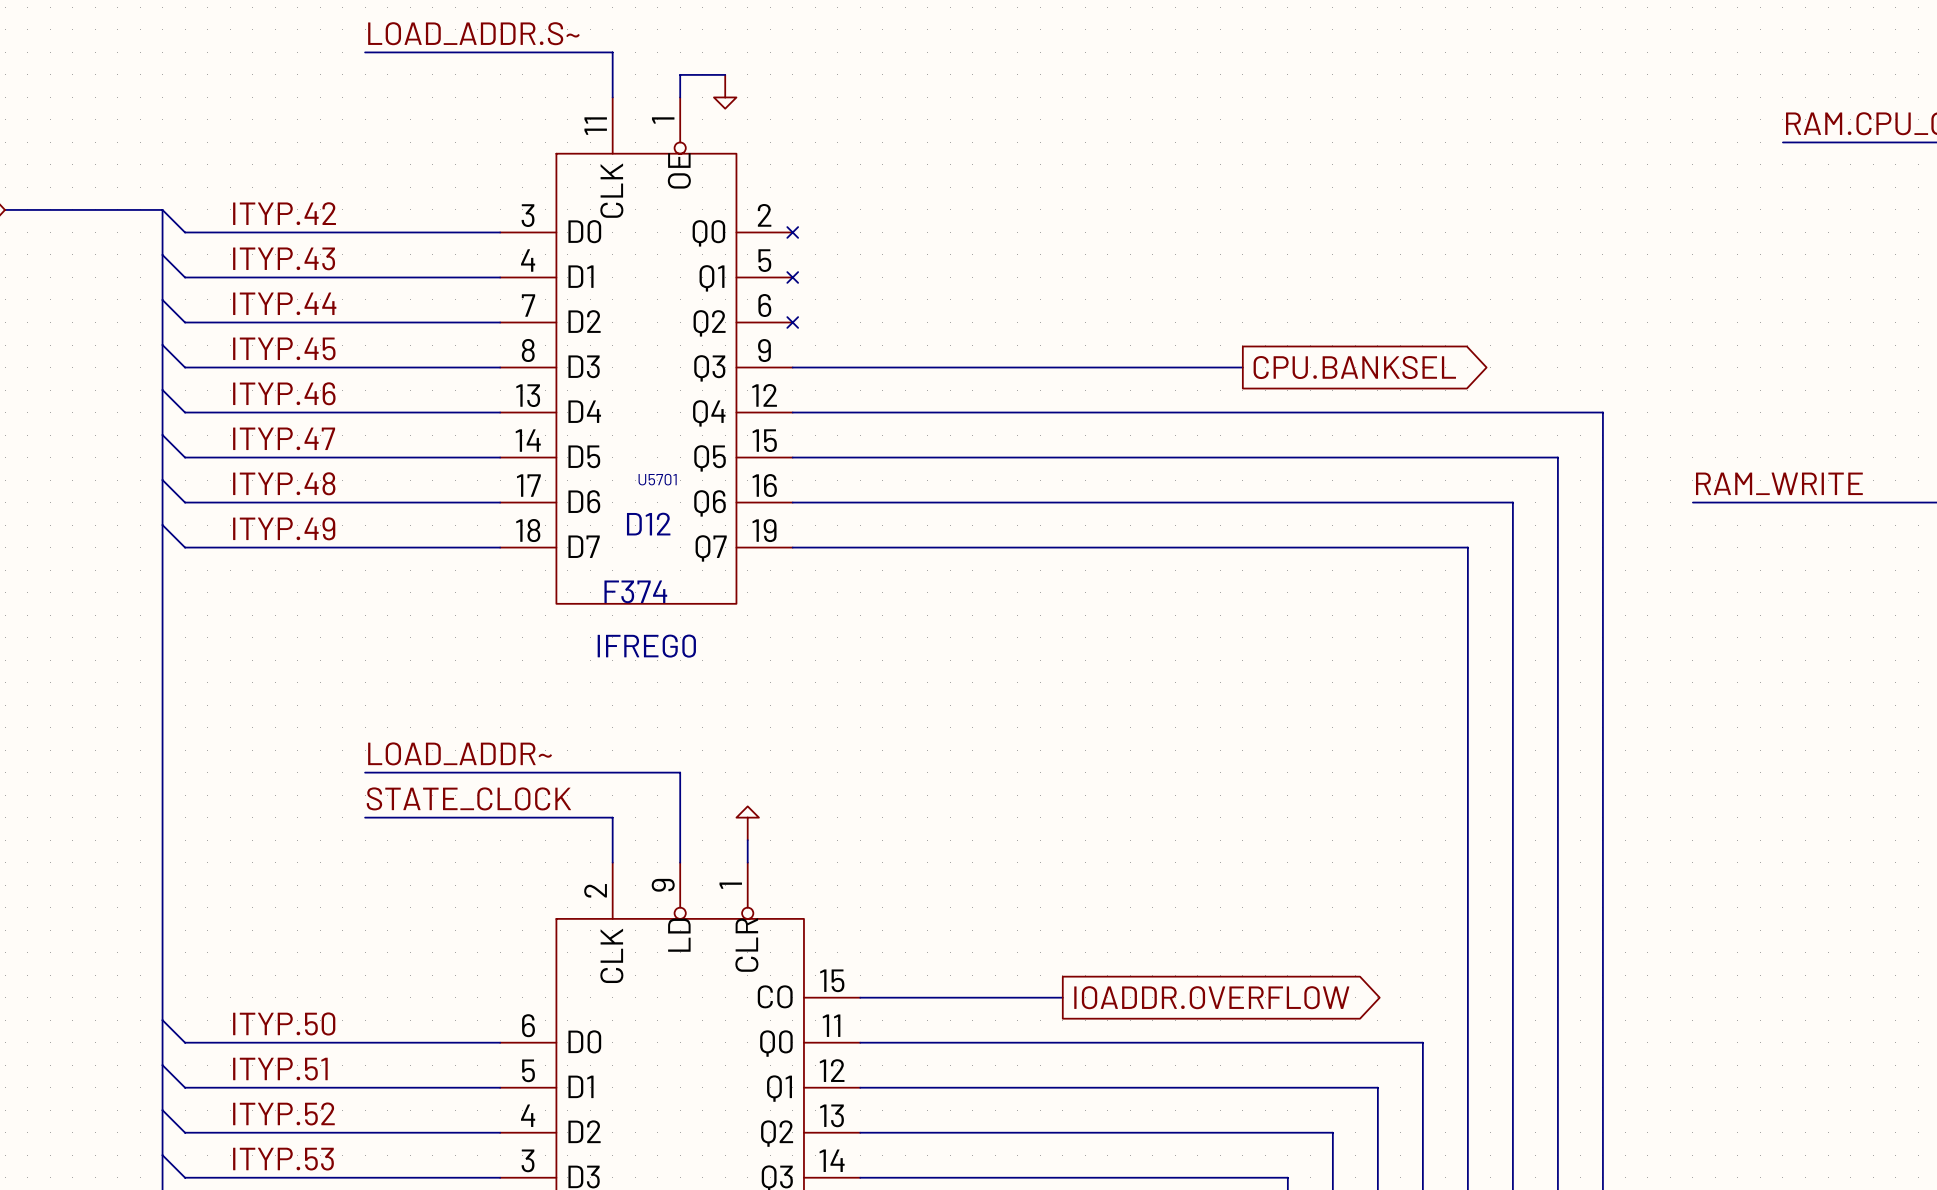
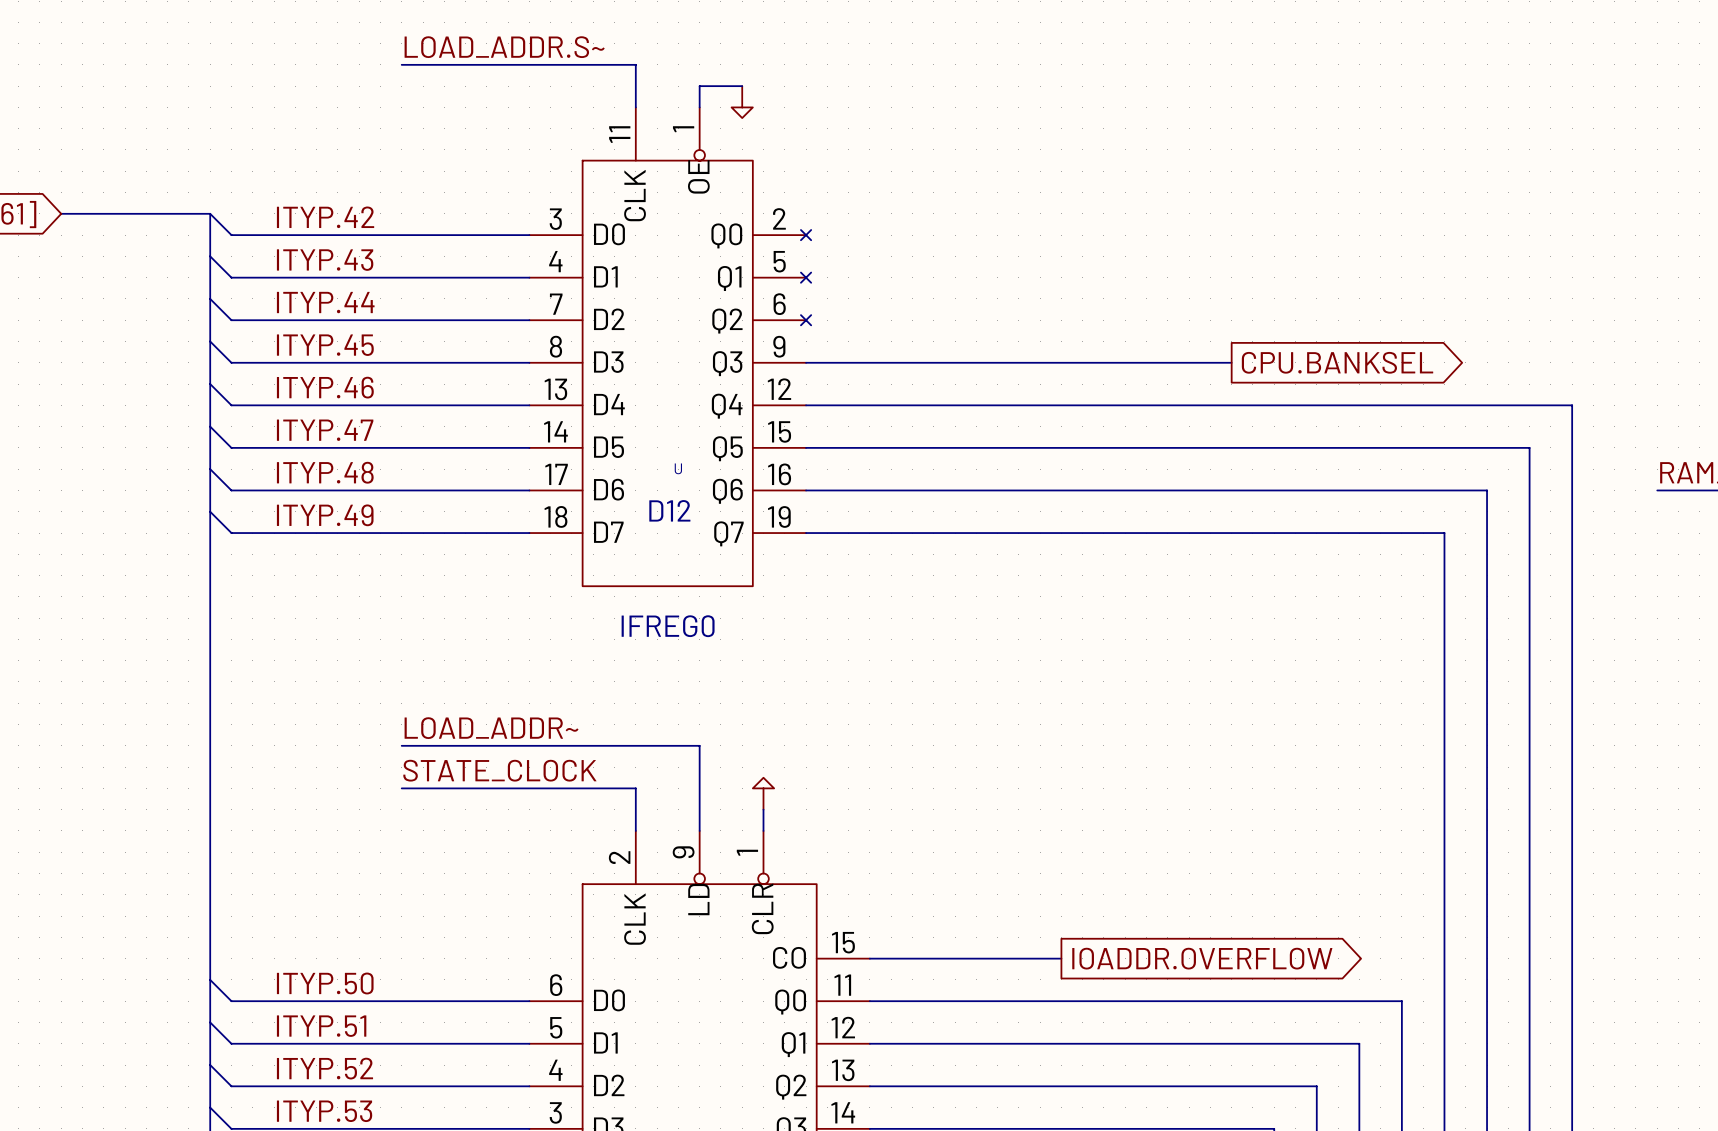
U5701 name: U5701 (657, 479) -> U (678, 468)
U5701 value: F374 (635, 591) -> none

